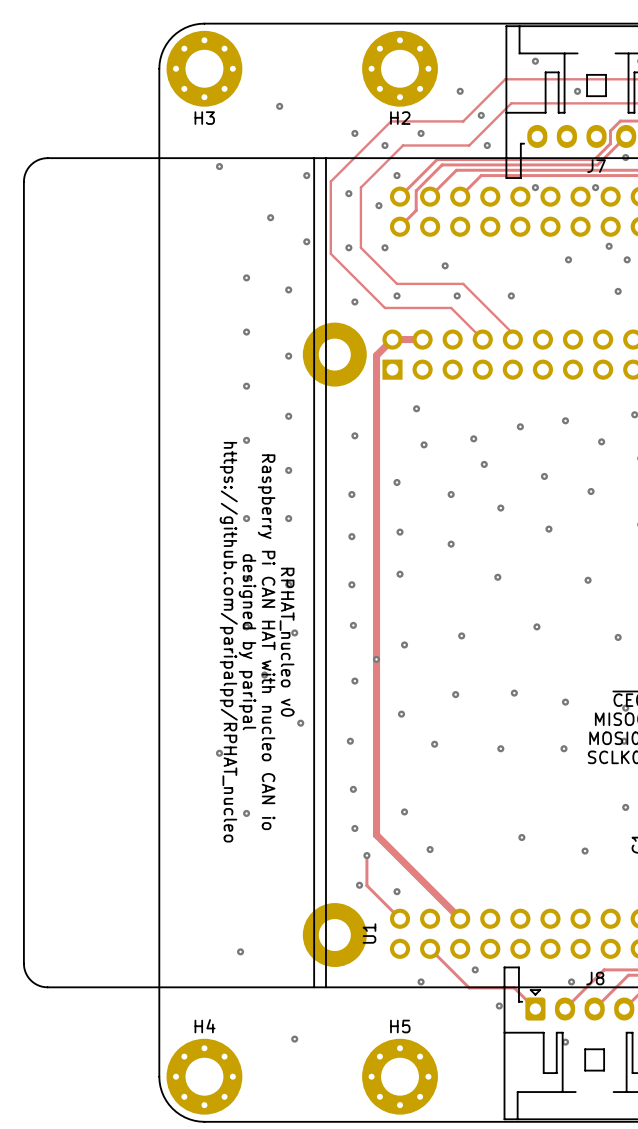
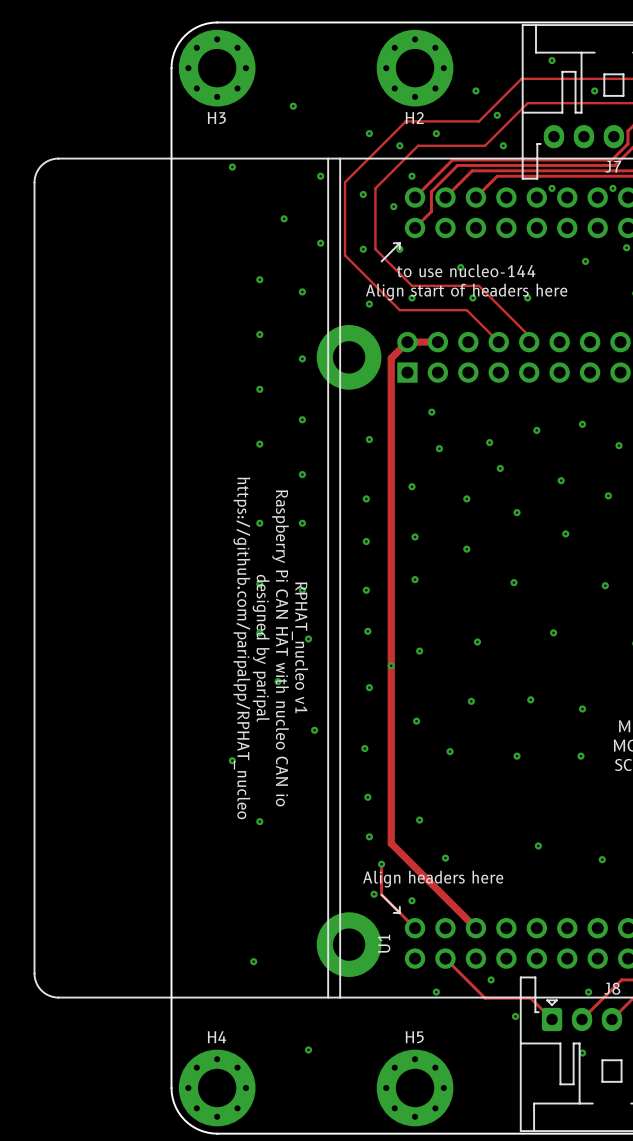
line: none -> (393, 243) (399, 243)
line: none -> (399, 243) (399, 249)
line: none -> (399, 243) (381, 261)
text: none -> to use nucleo-144 (466, 270)
text: none -> Align start of headers here (466, 292)
text: RPHAT_nucleo v0 (287, 642) -> RPHAT_nucleo v1 (299, 647)
text: none -> Align headers here (433, 879)
line: none -> (381, 894) (399, 912)
line: none -> (399, 906) (399, 912)
line: none -> (393, 912) (399, 912)

